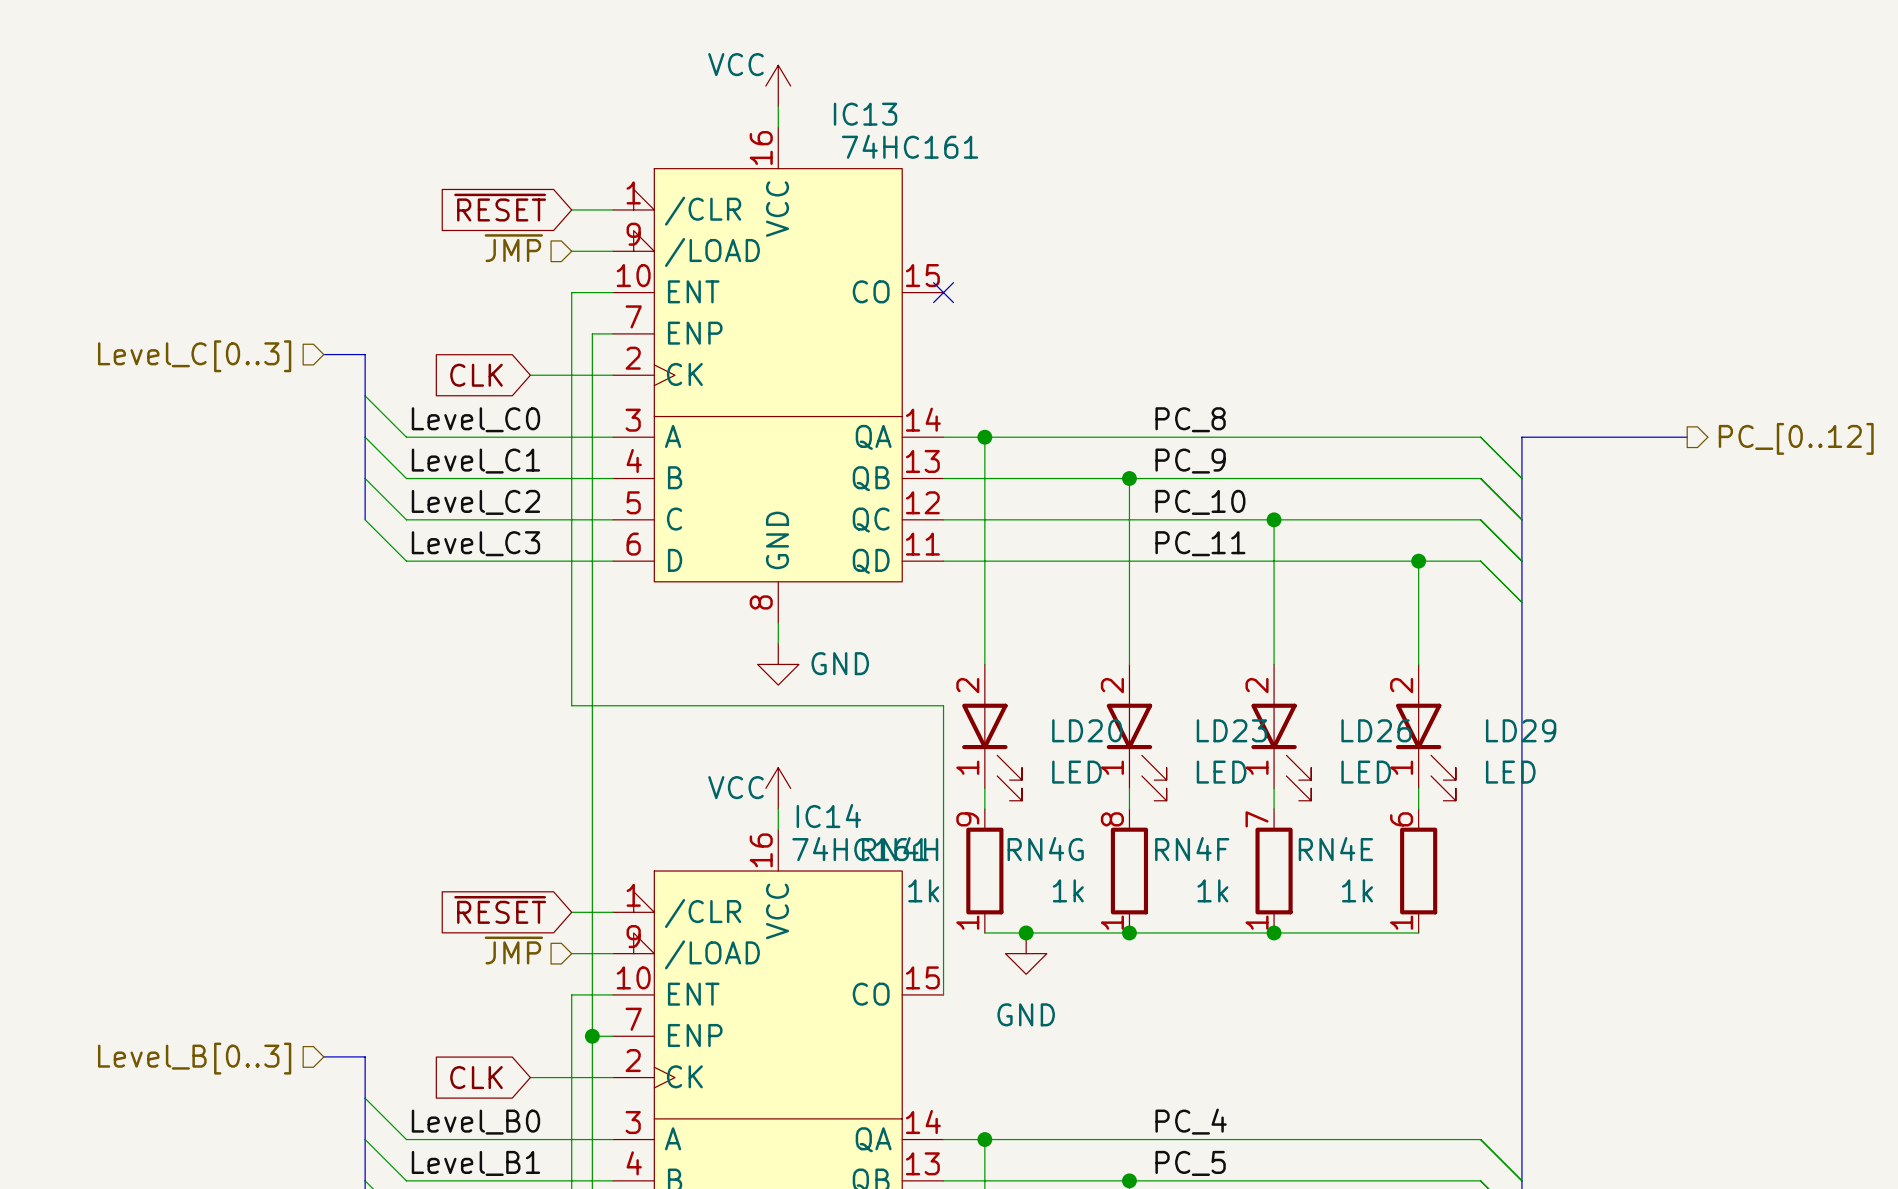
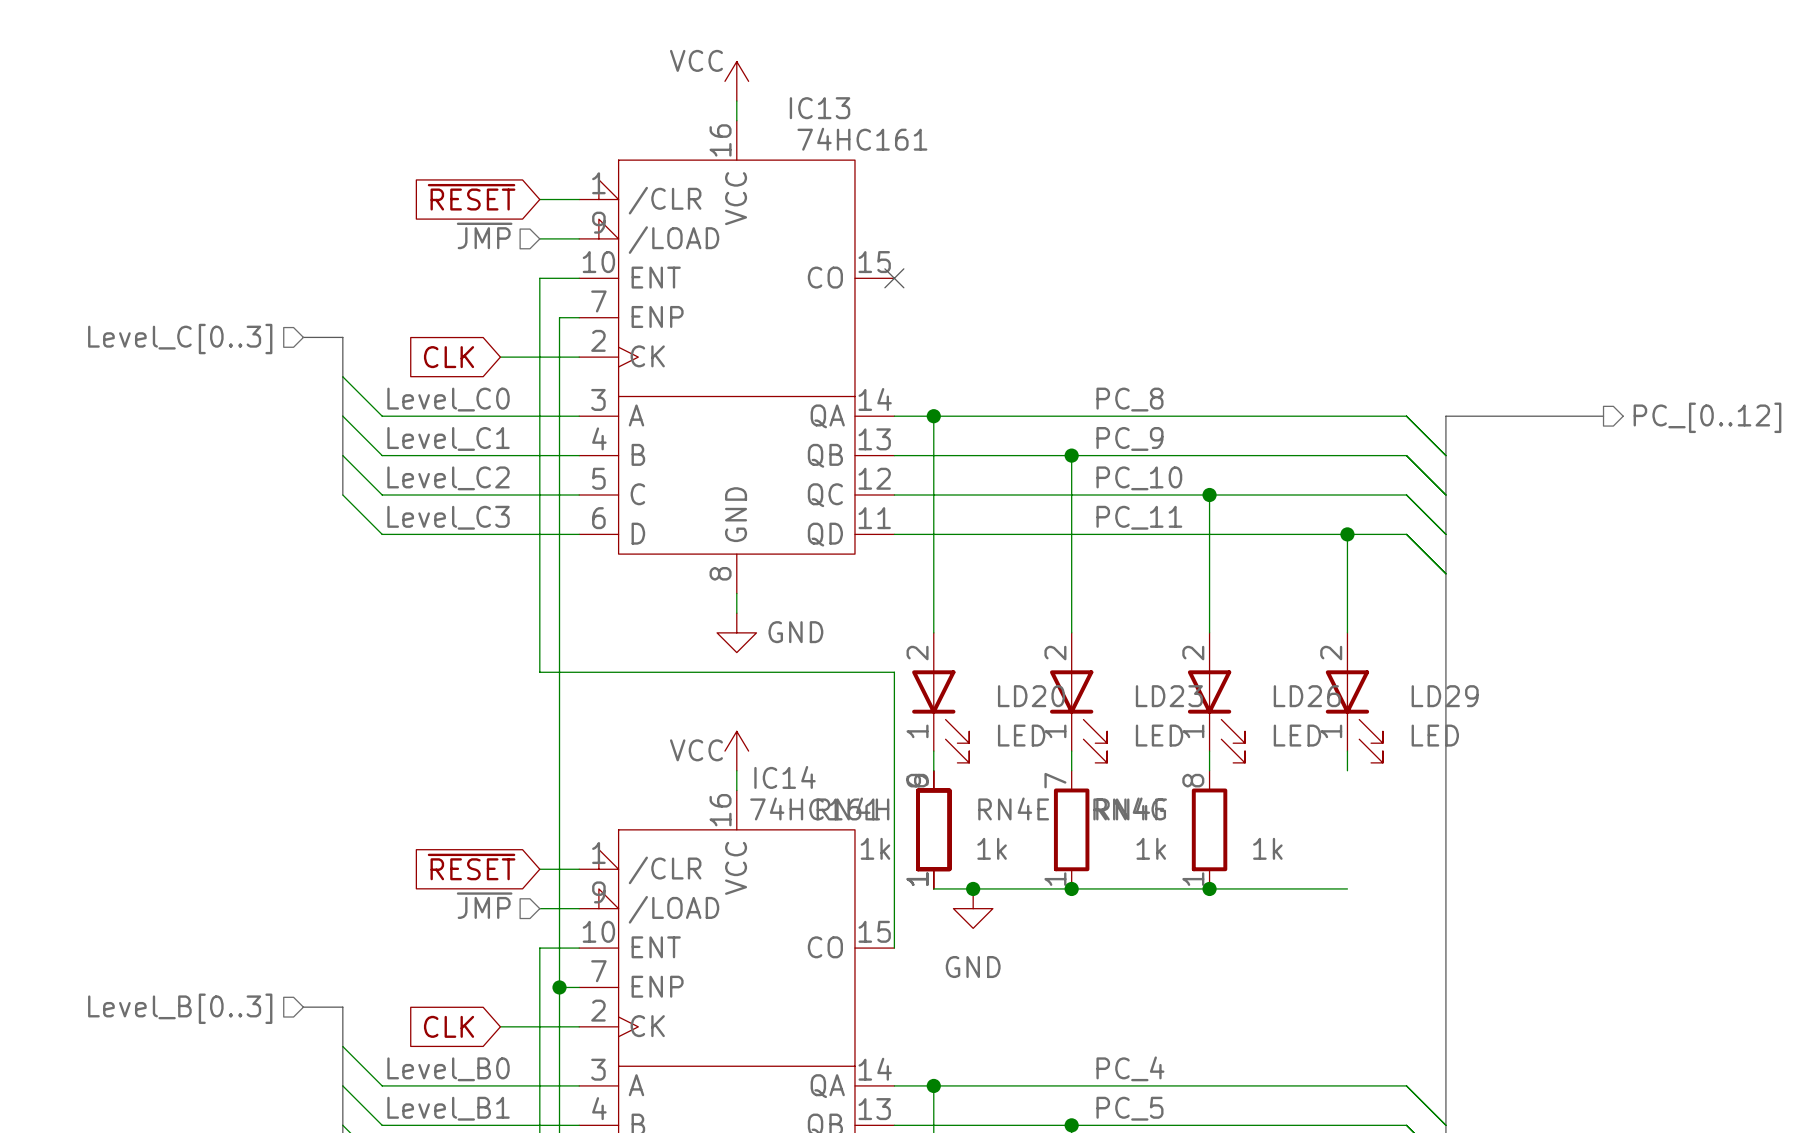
RN4E name position: RN4E (1335, 849) -> RN4E (1013, 808)
RN4G position: (1129, 871) -> (1209, 829)
RN4F position: (1274, 871) -> (1071, 829)
RN4E position: (1418, 871) -> (933, 829)
RN4G value position: 1k (1068, 890) -> 1k (1267, 848)
RN4E value position: 1k (1357, 890) -> 1k (992, 848)

